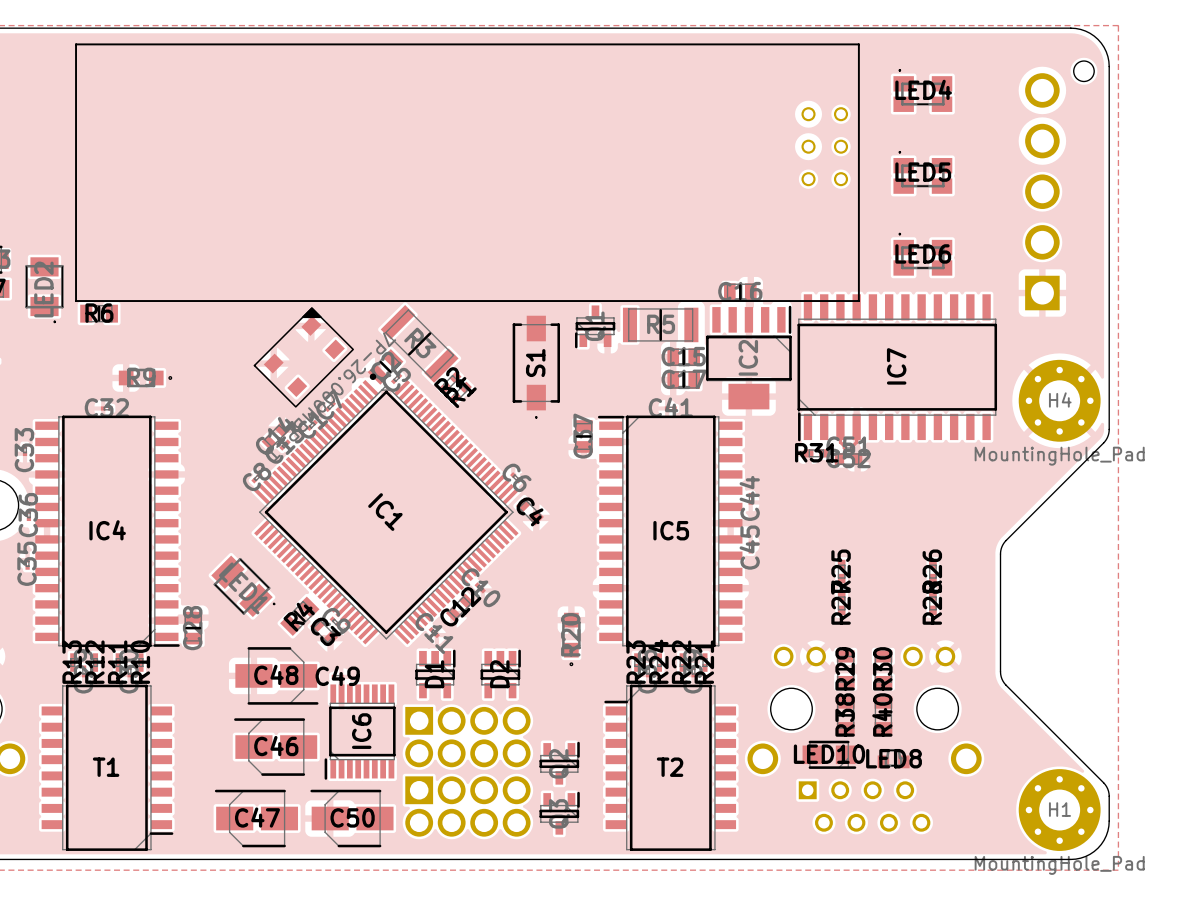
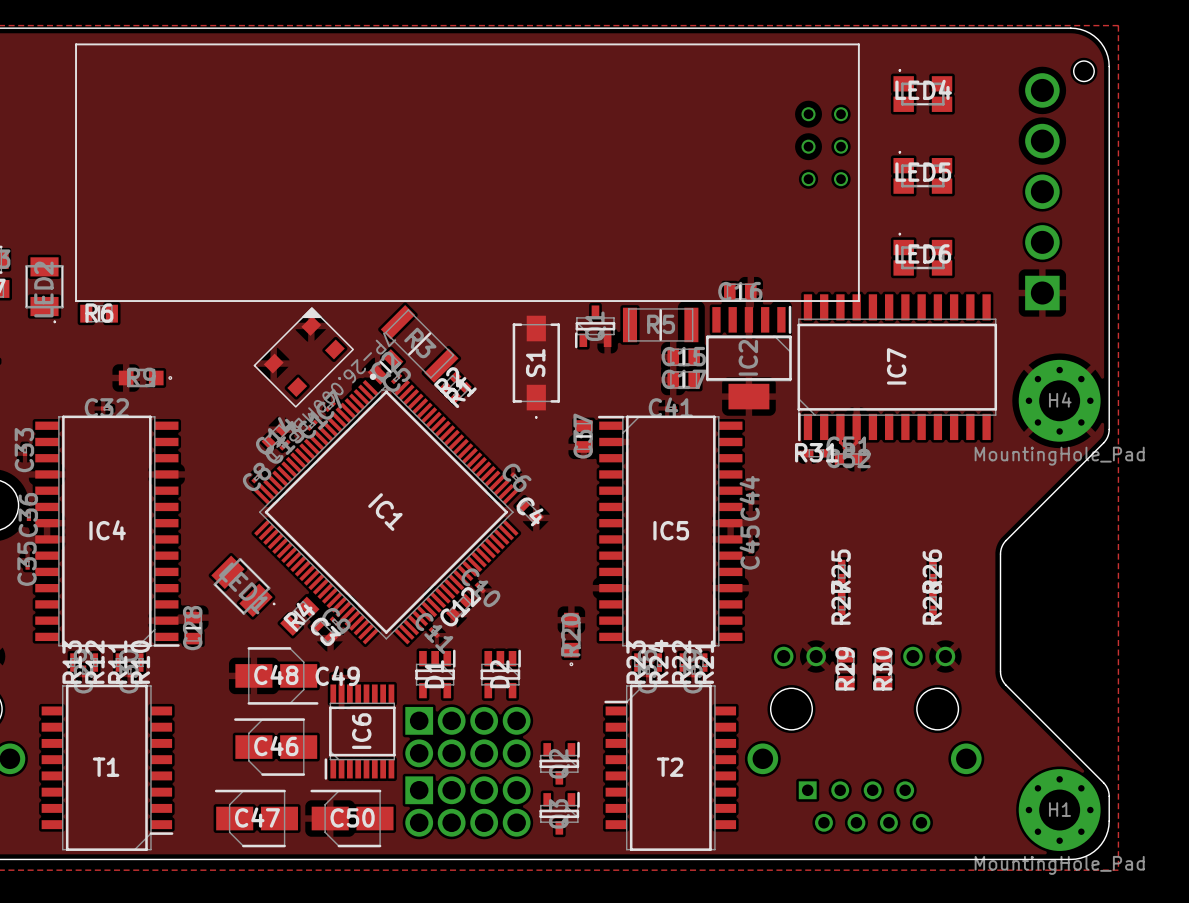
R38: (845, 715) -> none
R40: (883, 715) -> none
LED10: (829, 754) -> none
LED8: (893, 758) -> none

